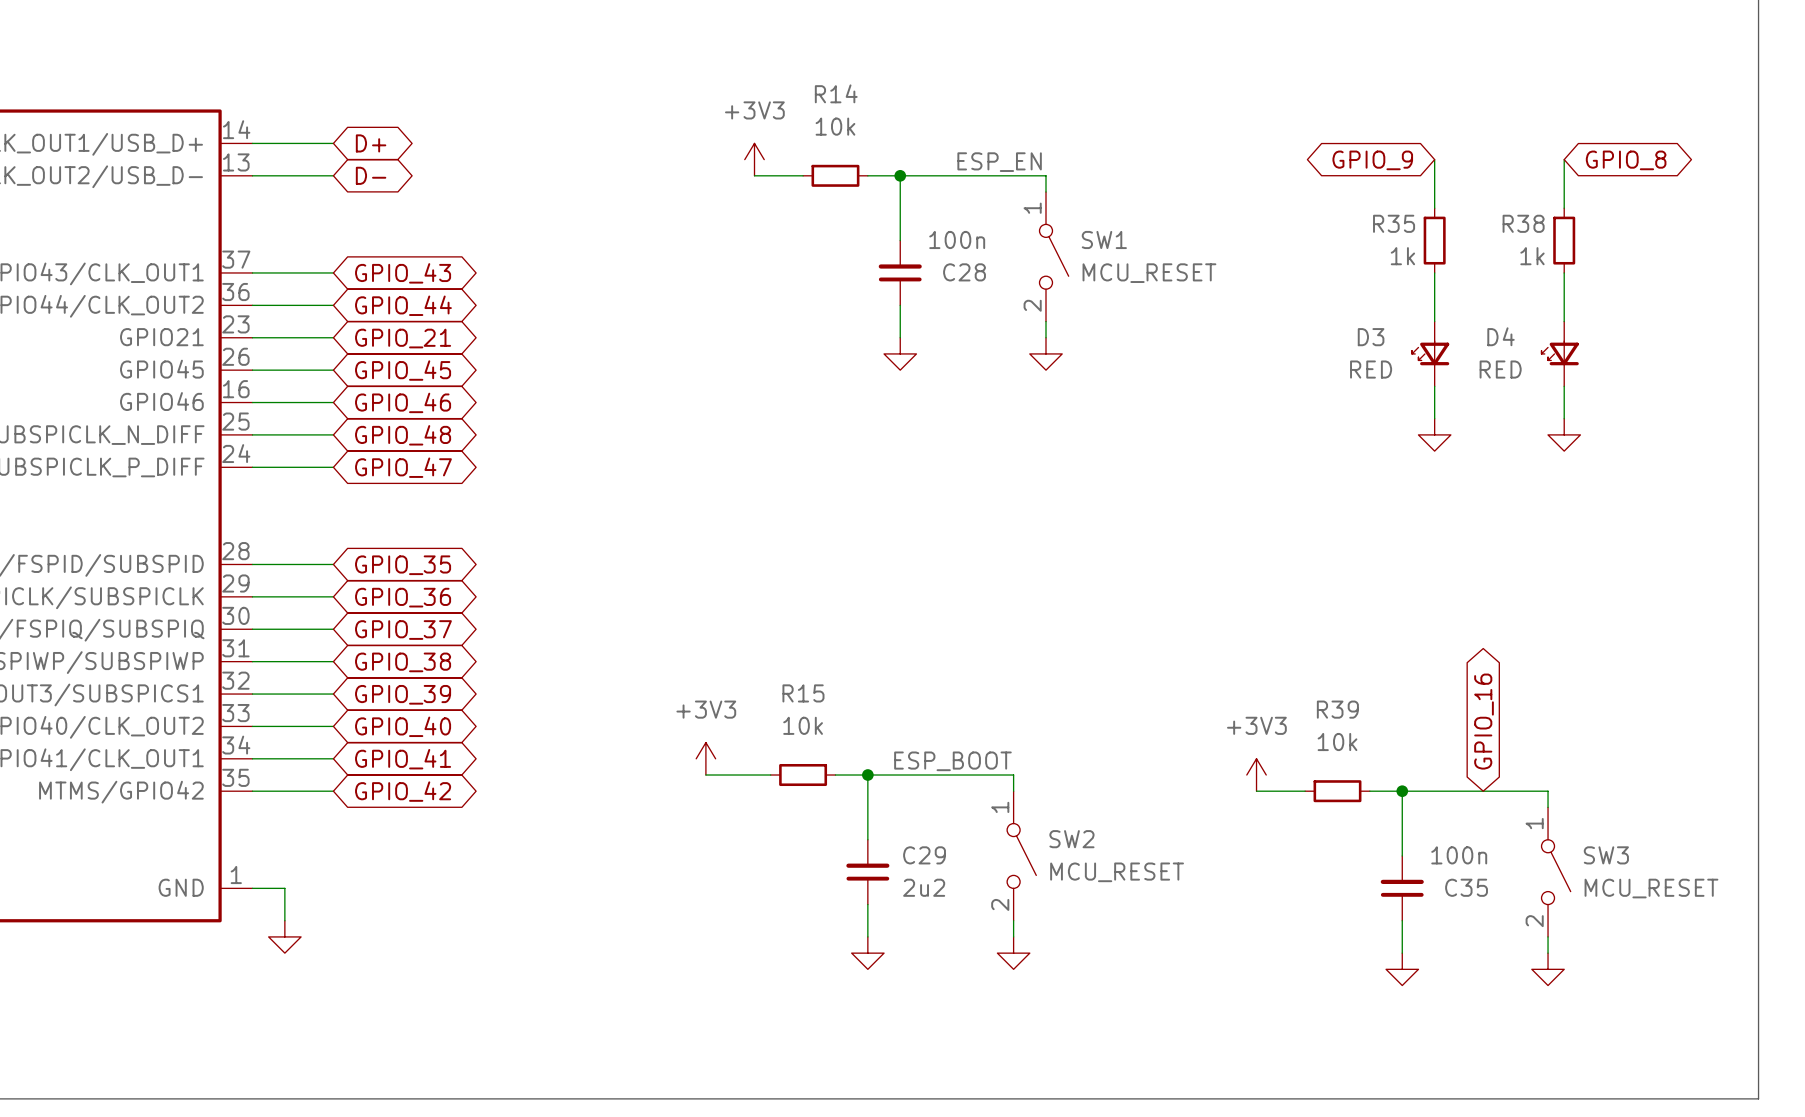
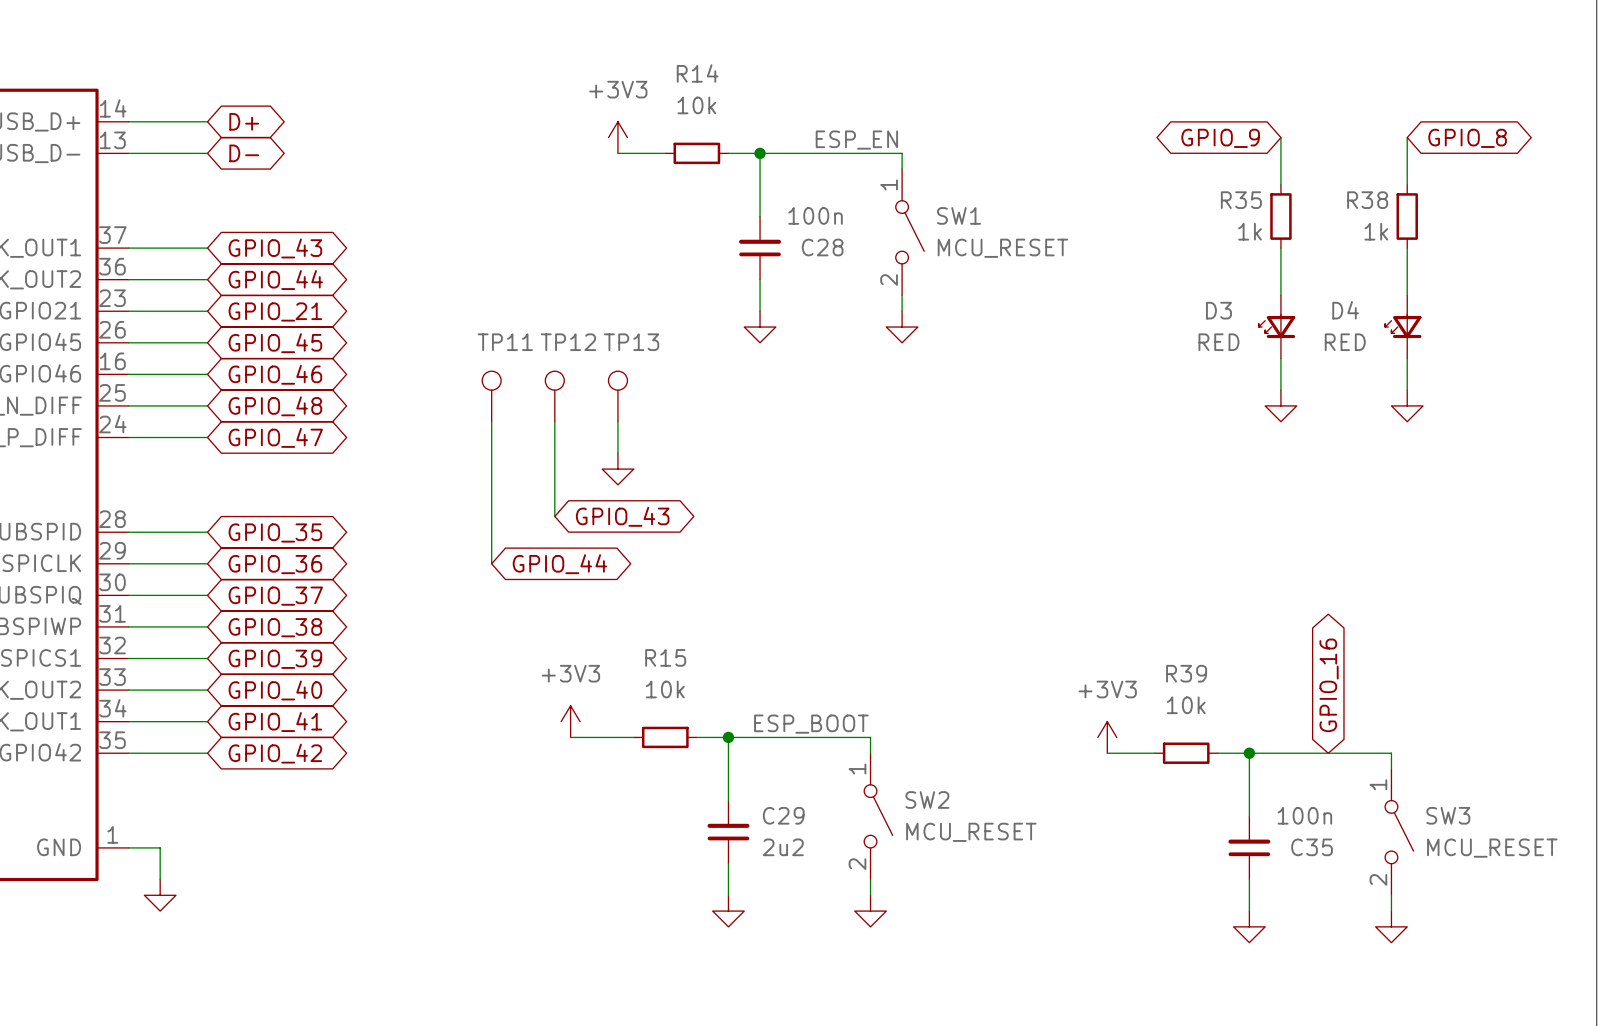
TP11: none -> (491, 396)
TP12: none -> (554, 396)
TP13: none -> (617, 396)
wire: none -> (491, 421) (491, 563)
wire: none -> (554, 421) (554, 516)
wire: none -> (617, 421) (617, 453)
power symbol: none -> (617, 469)
global label: none -> GPIO_43 (622, 516)
global label: none -> GPIO_44 (559, 564)

